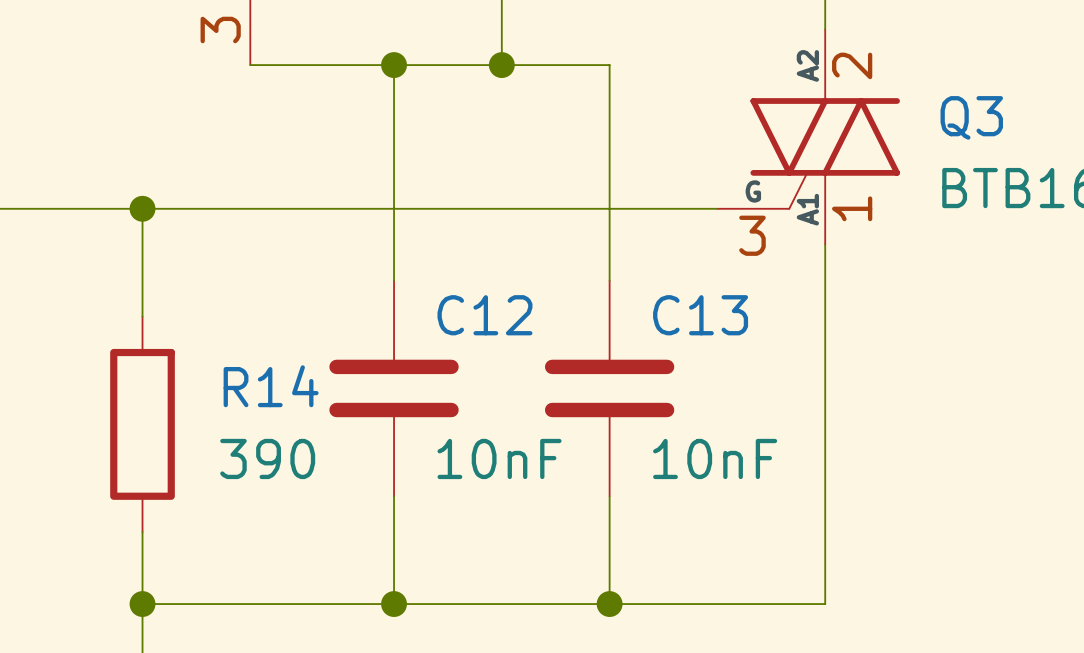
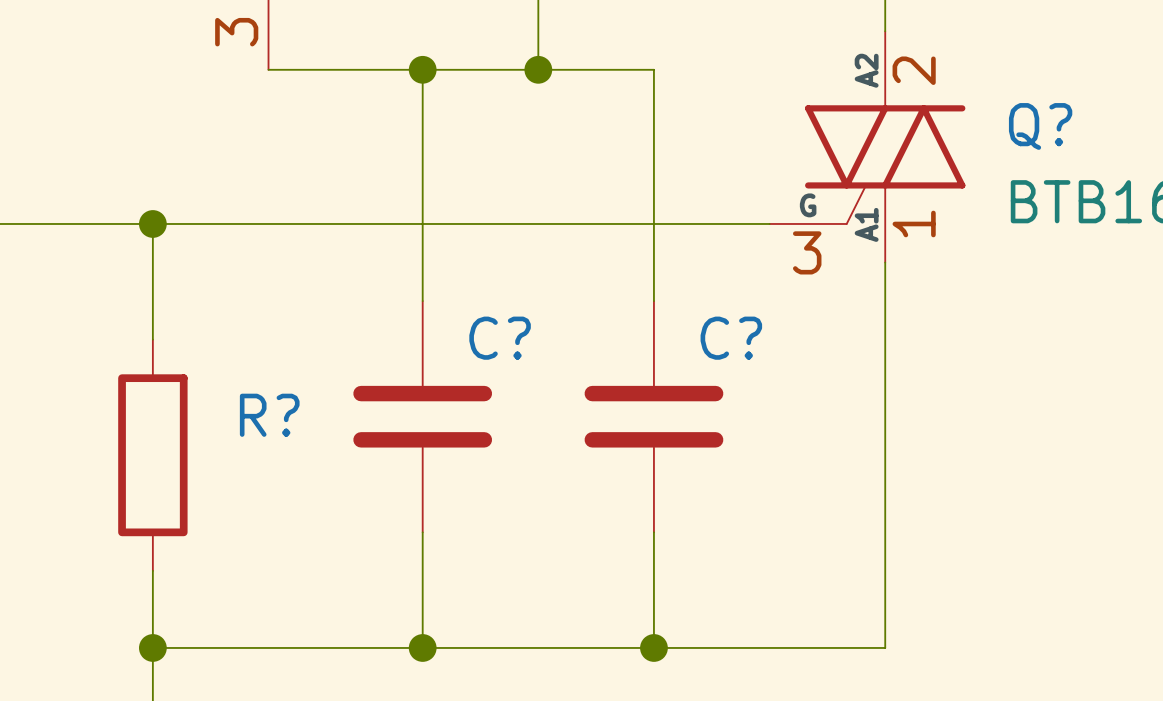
Q3 name: Q3 (971, 117) -> Q? (1040, 126)
C12 name: C12 (484, 315) -> C? (500, 338)
C13 name: C13 (700, 315) -> C? (731, 338)
R14 name: R14 (271, 386) -> R? (269, 415)
R14 value: 390 (267, 458) -> none
C12 value: 10nF (499, 458) -> none
C13 value: 10nF (715, 458) -> none

